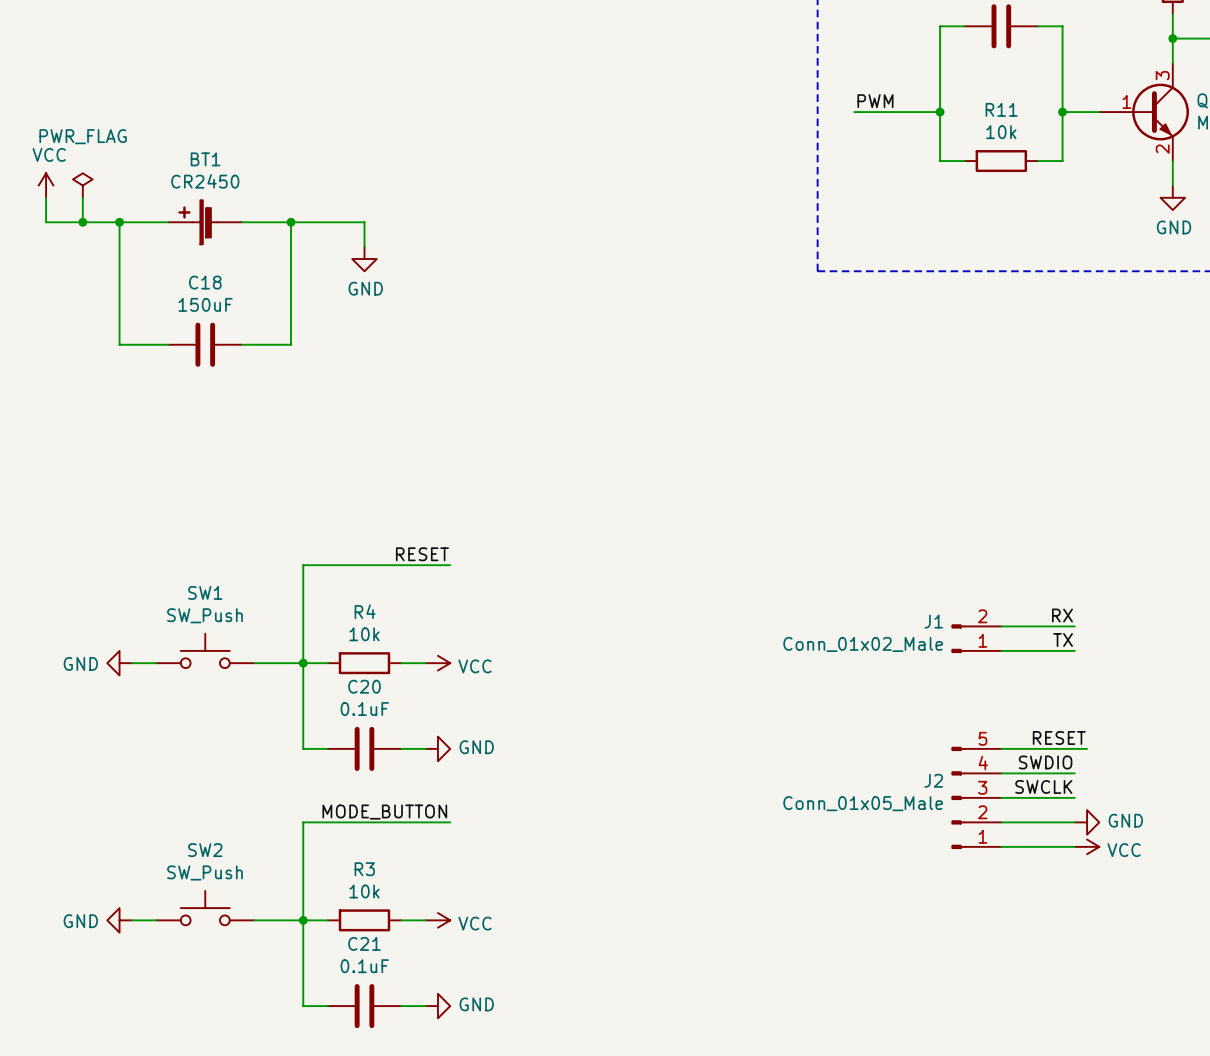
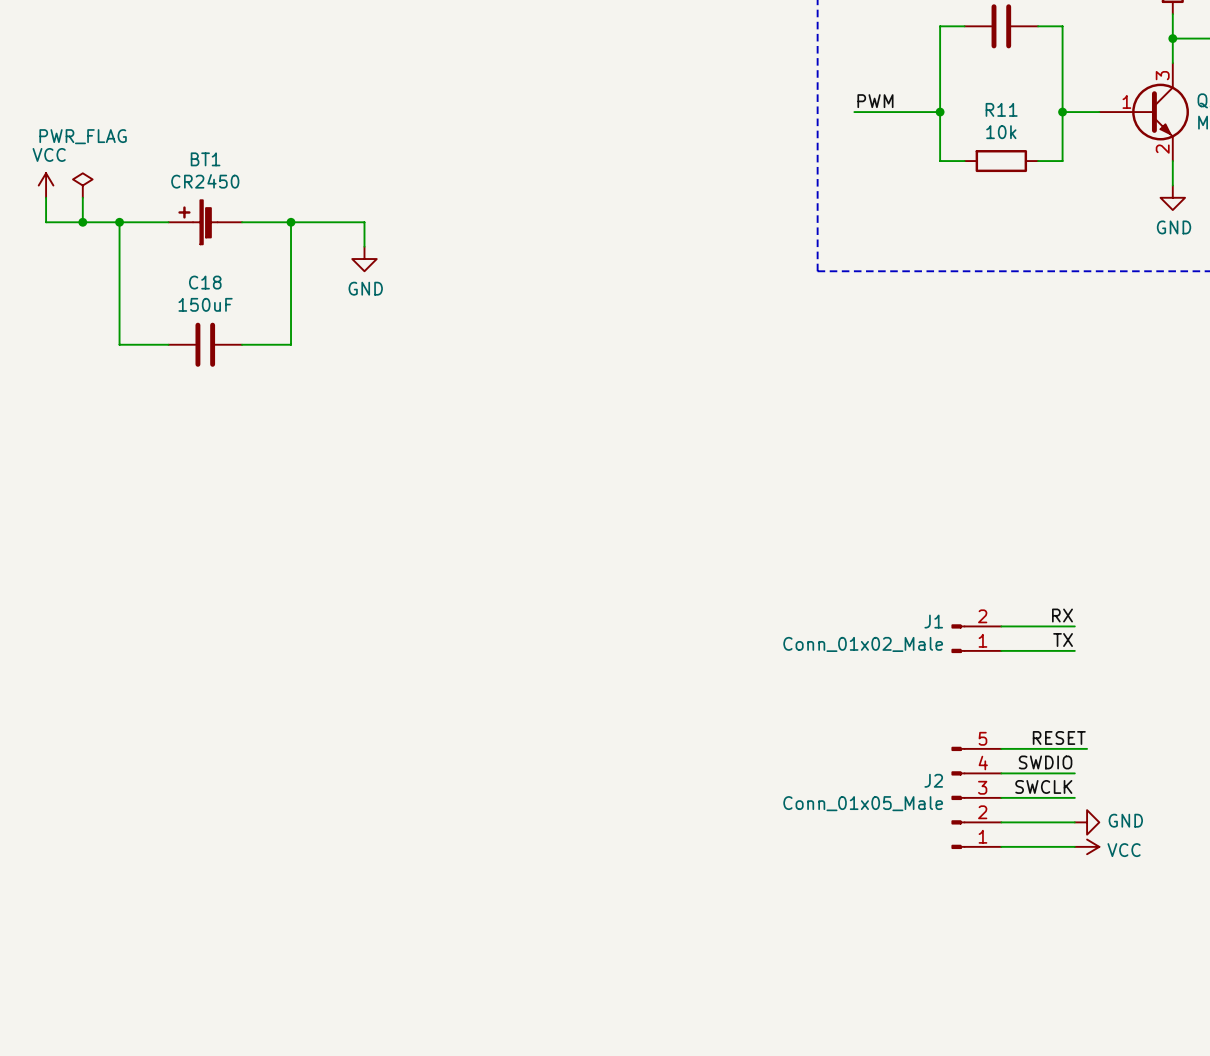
label: RESET (422, 554) -> none
wire: (450, 565) (303, 565) (303, 748) (327, 748) -> none
SW1: SW_Push (205, 650) -> none
power symbol: GND (119, 663) -> none
wire: (131, 663) (156, 663) -> none
wire: (254, 663) (327, 663) -> none
junction: (303, 663) -> none
R4: 10k (364, 663) -> none
wire: (401, 663) (425, 663) -> none
power symbol: VCC (437, 663) -> none
C20: 0.1uF (364, 748) -> none
wire: (401, 748) (425, 748) -> none
power symbol: GND (437, 748) -> none
label: MODE_BUTTON (384, 812) -> none
wire: (450, 822) (303, 822) (303, 1006) (327, 1006) -> none
SW2: SW_Push (205, 908) -> none
power symbol: GND (119, 920) -> none
wire: (131, 920) (156, 920) -> none
wire: (254, 920) (327, 920) -> none
junction: (303, 920) -> none
R3: 10k (364, 920) -> none
wire: (401, 920) (425, 920) -> none
power symbol: VCC (437, 920) -> none
C21: 0.1uF (364, 1006) -> none
wire: (401, 1006) (425, 1006) -> none
power symbol: GND (437, 1006) -> none

